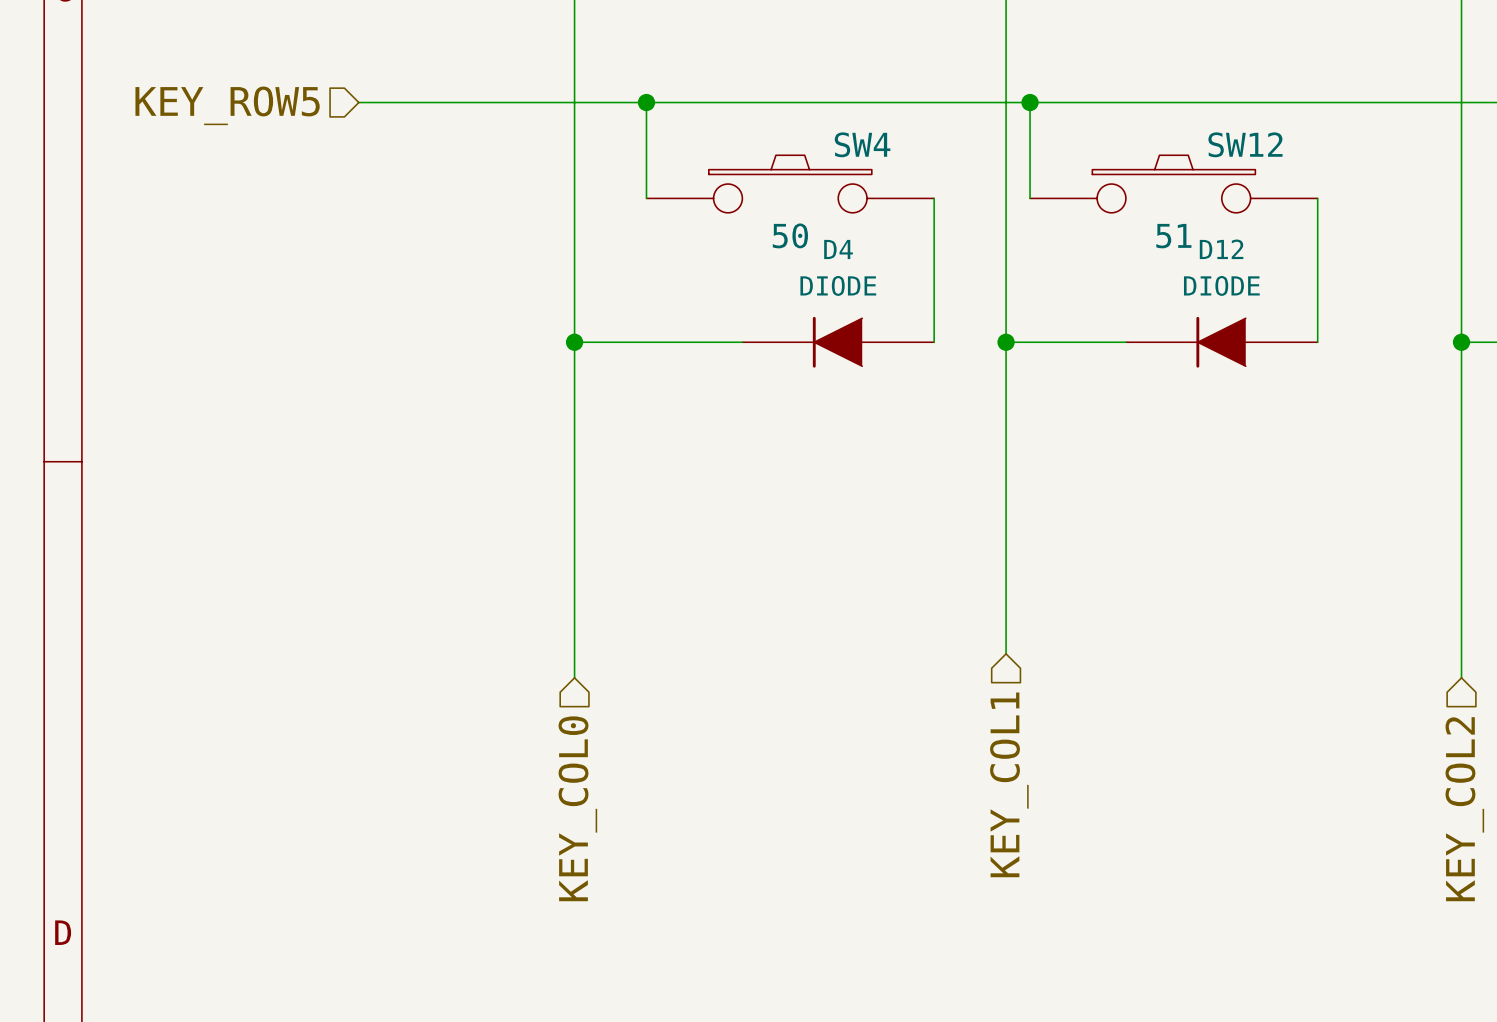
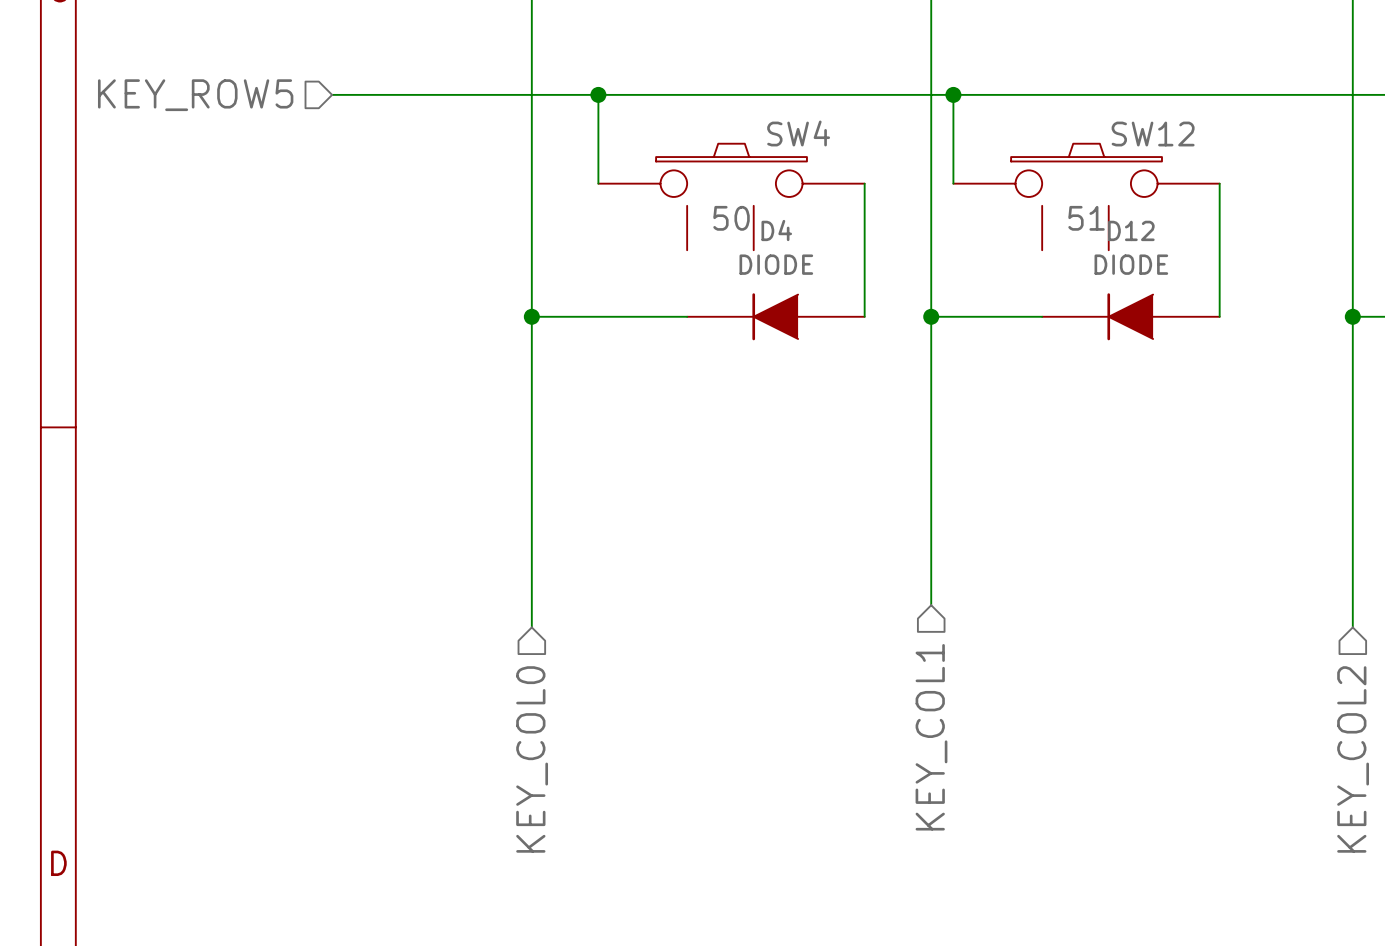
SW4 symbol: [646, 155, 935, 213] -> [598, 143, 865, 251]
SW12 symbol: [1030, 155, 1318, 213] -> [953, 143, 1220, 251]

